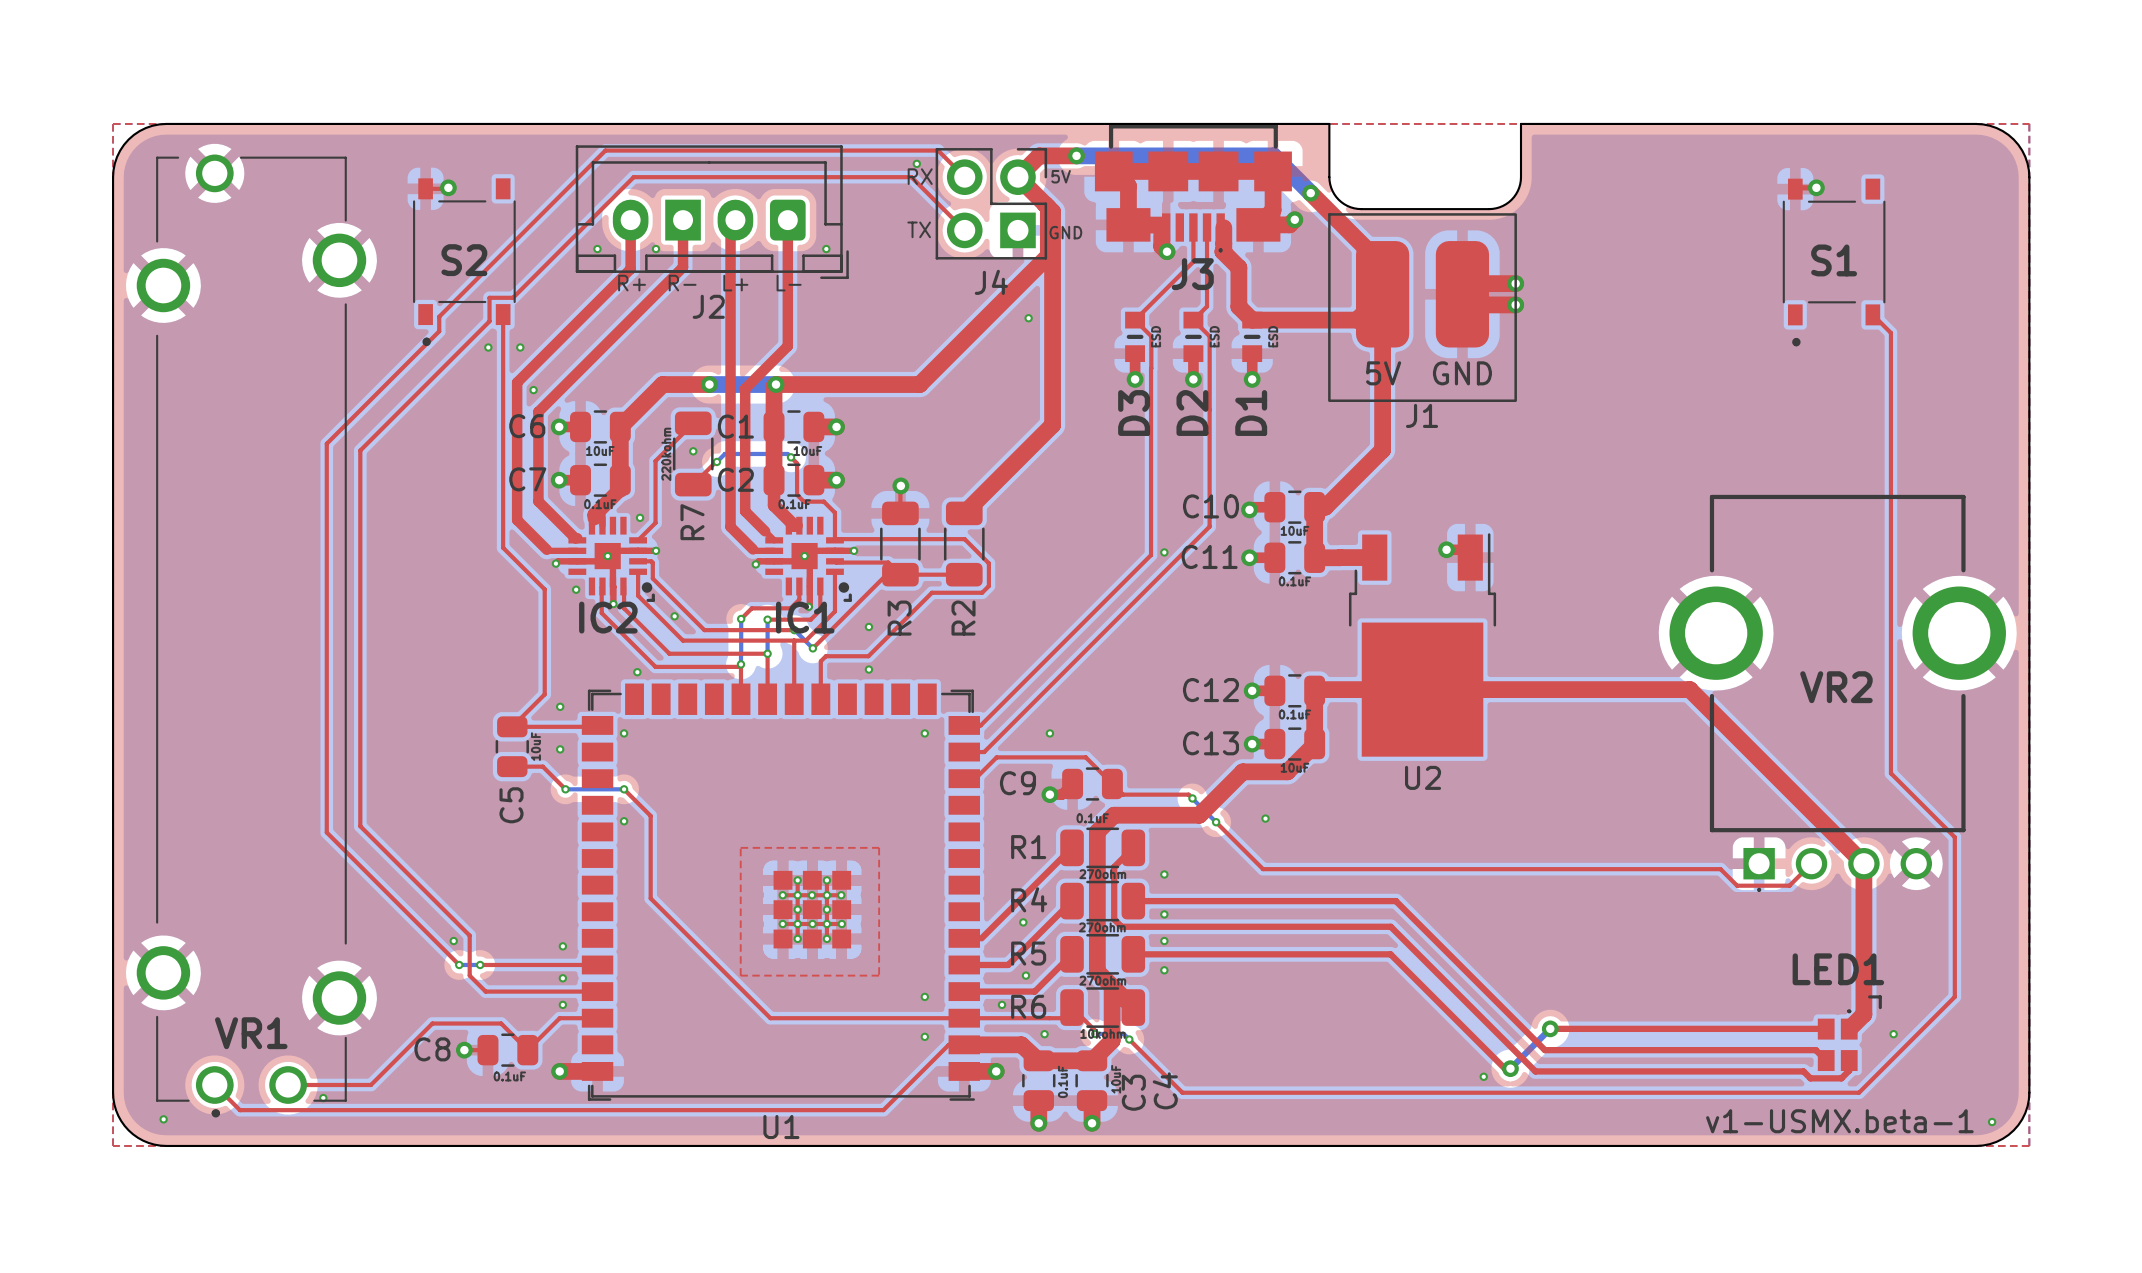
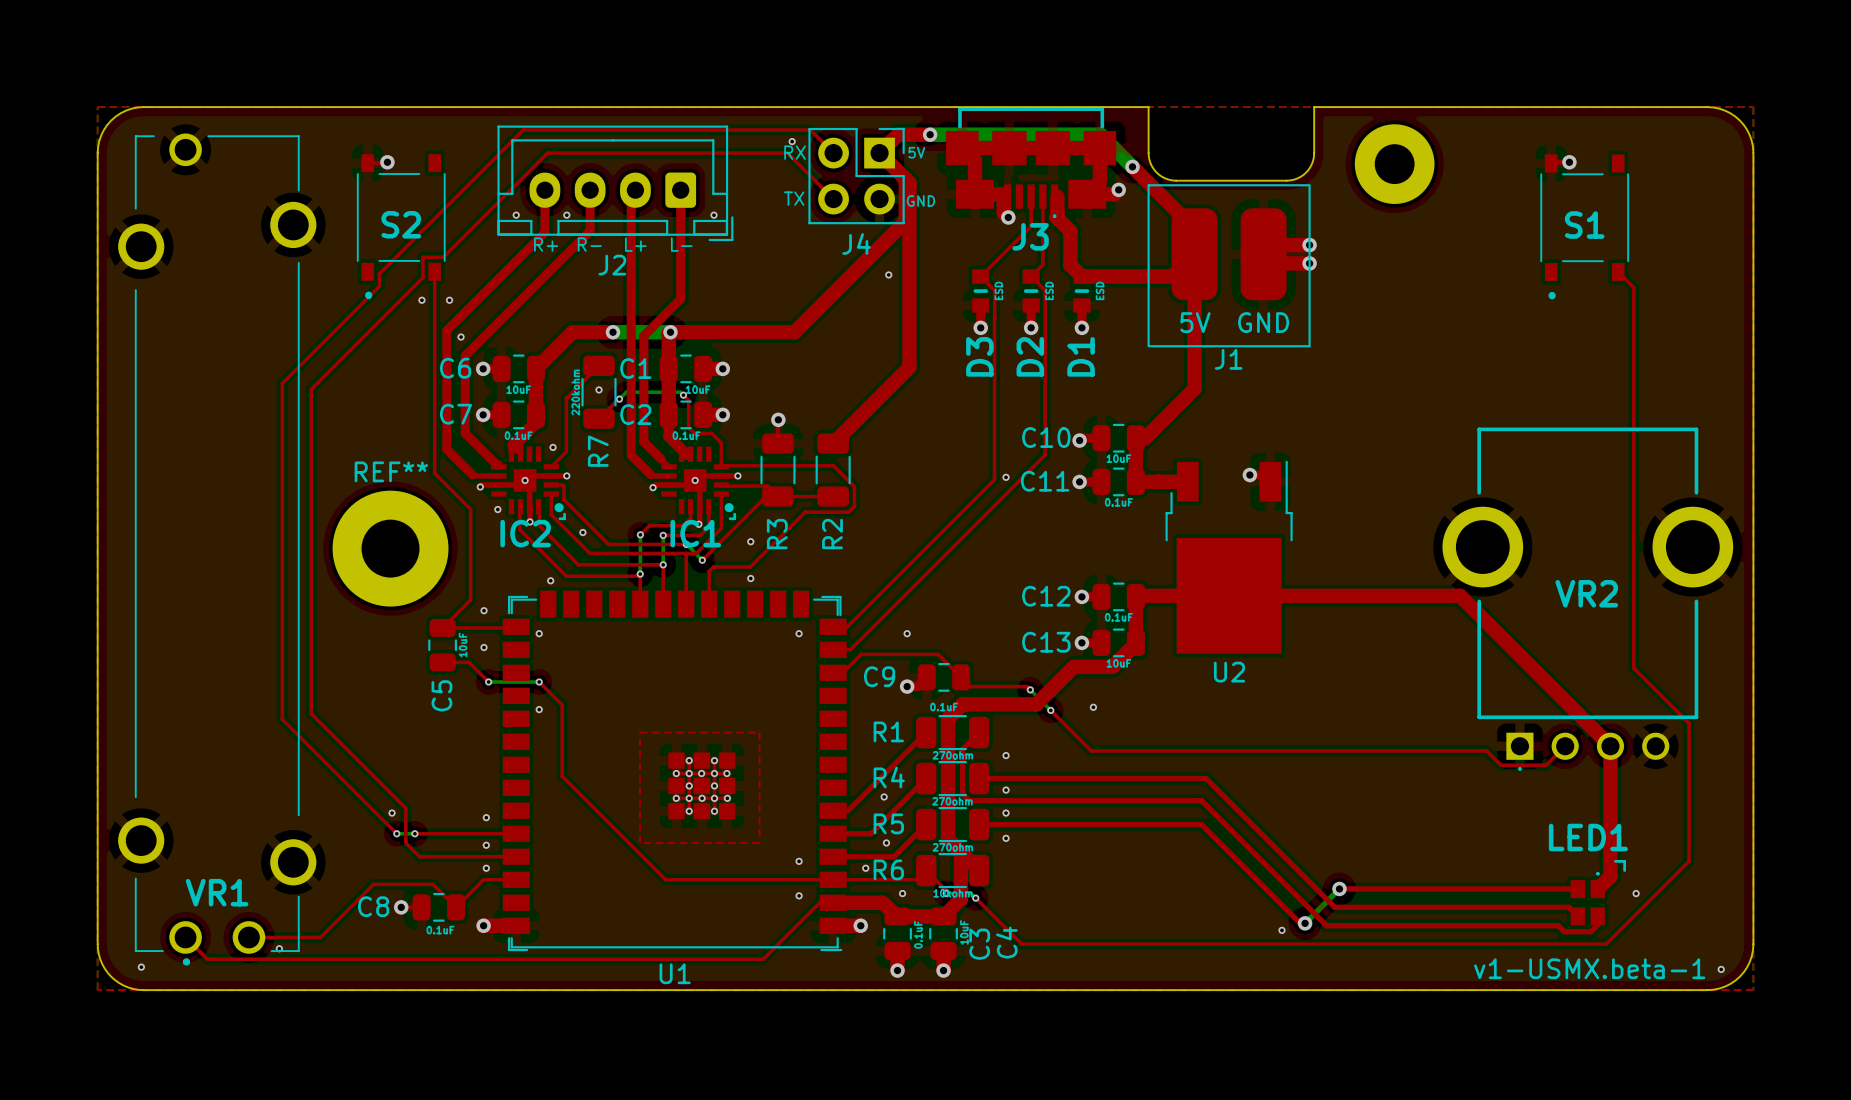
J2 footprint: [575, 145, 849, 280] -> [497, 125, 734, 242]
J4 footprint: [935, 148, 1048, 260] -> [808, 127, 905, 225]
part: none -> (1394, 164)
REF**: none -> (390, 548)

